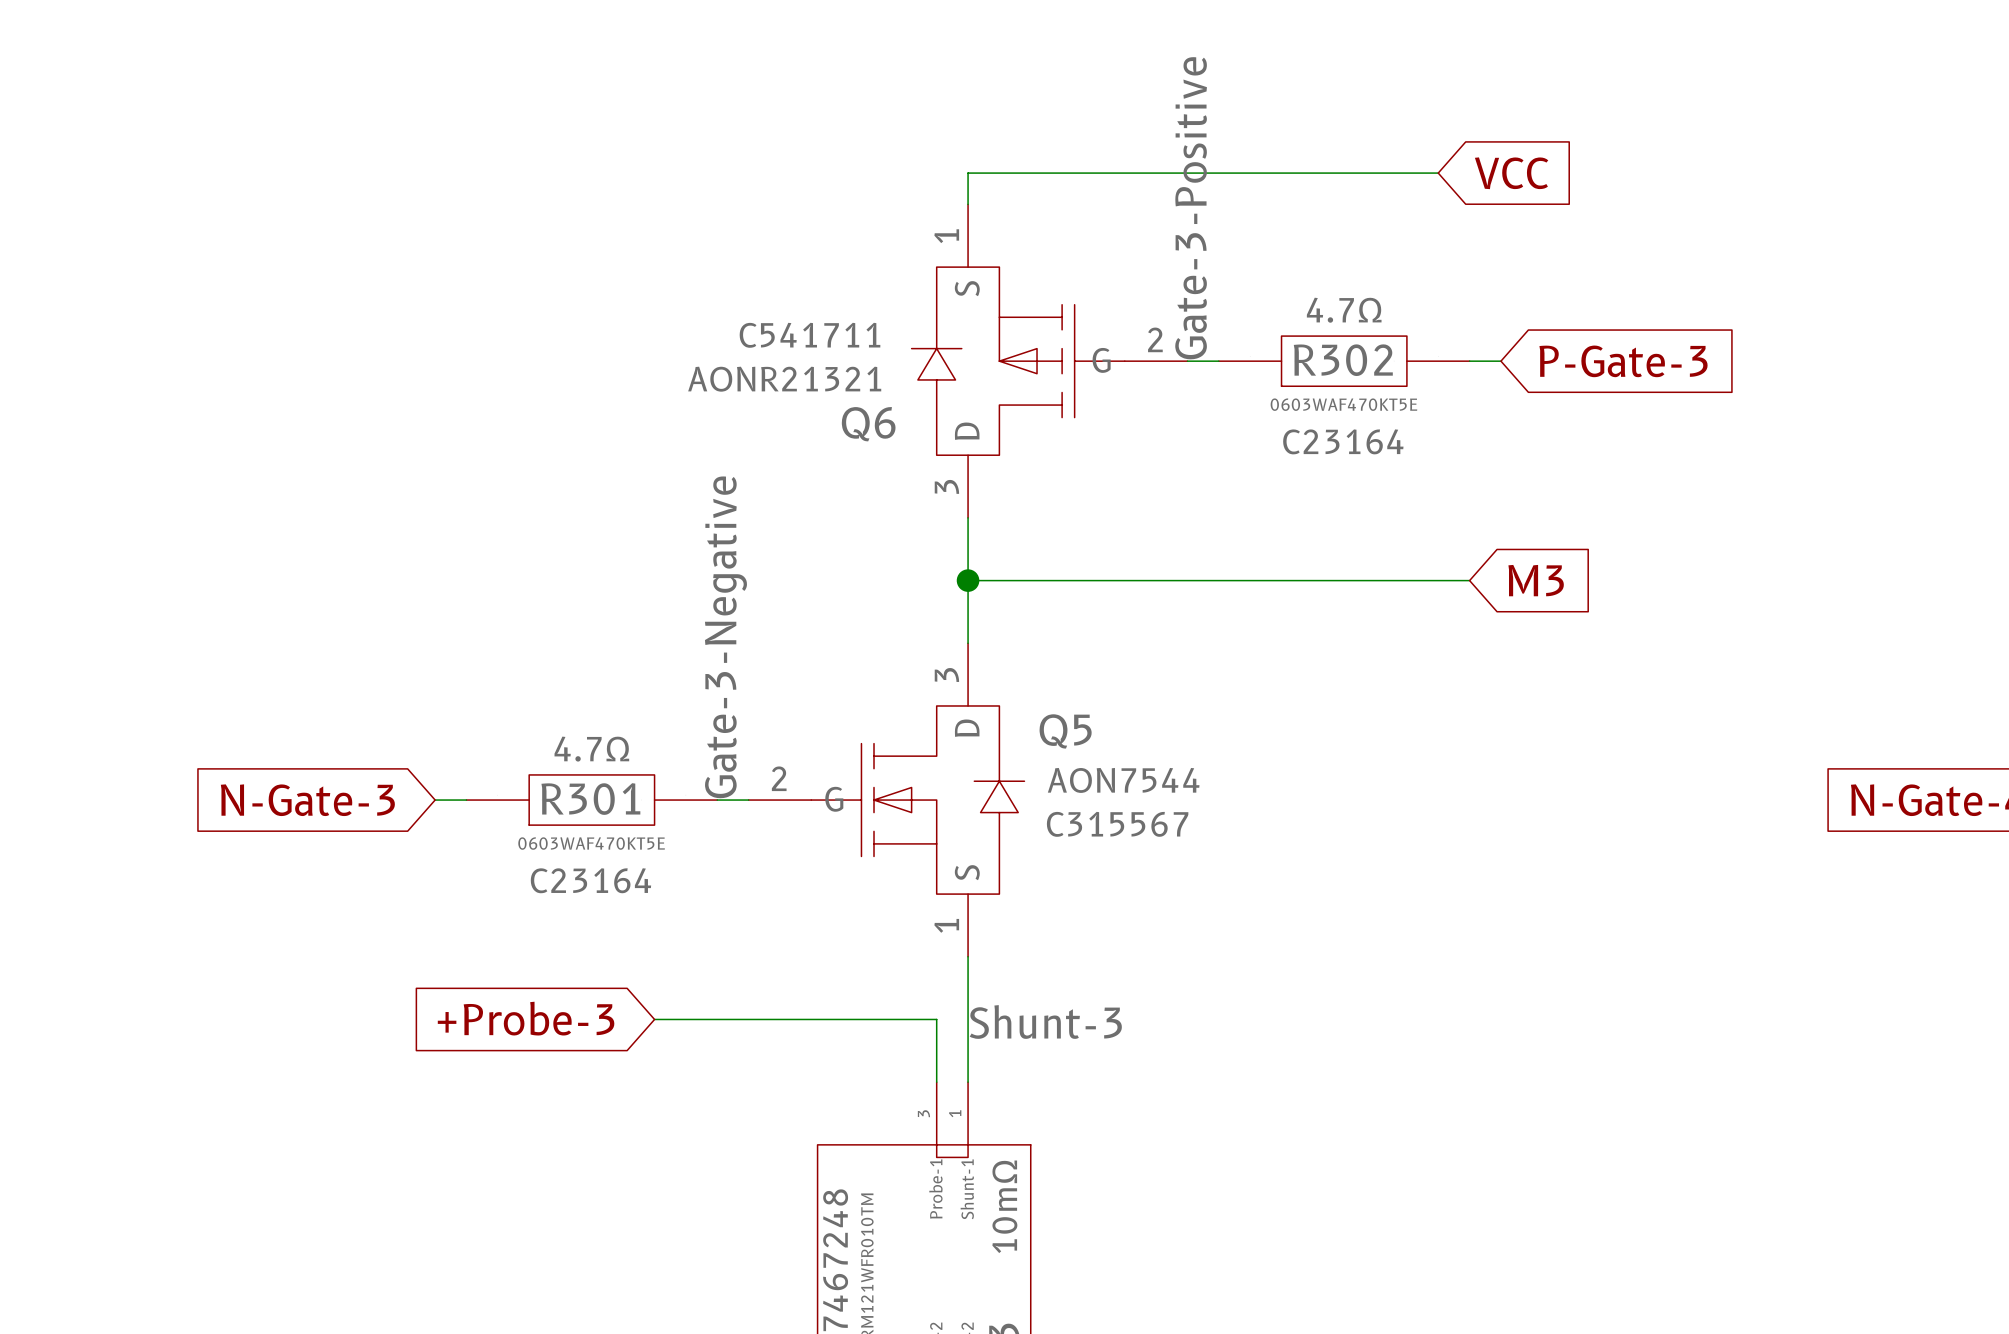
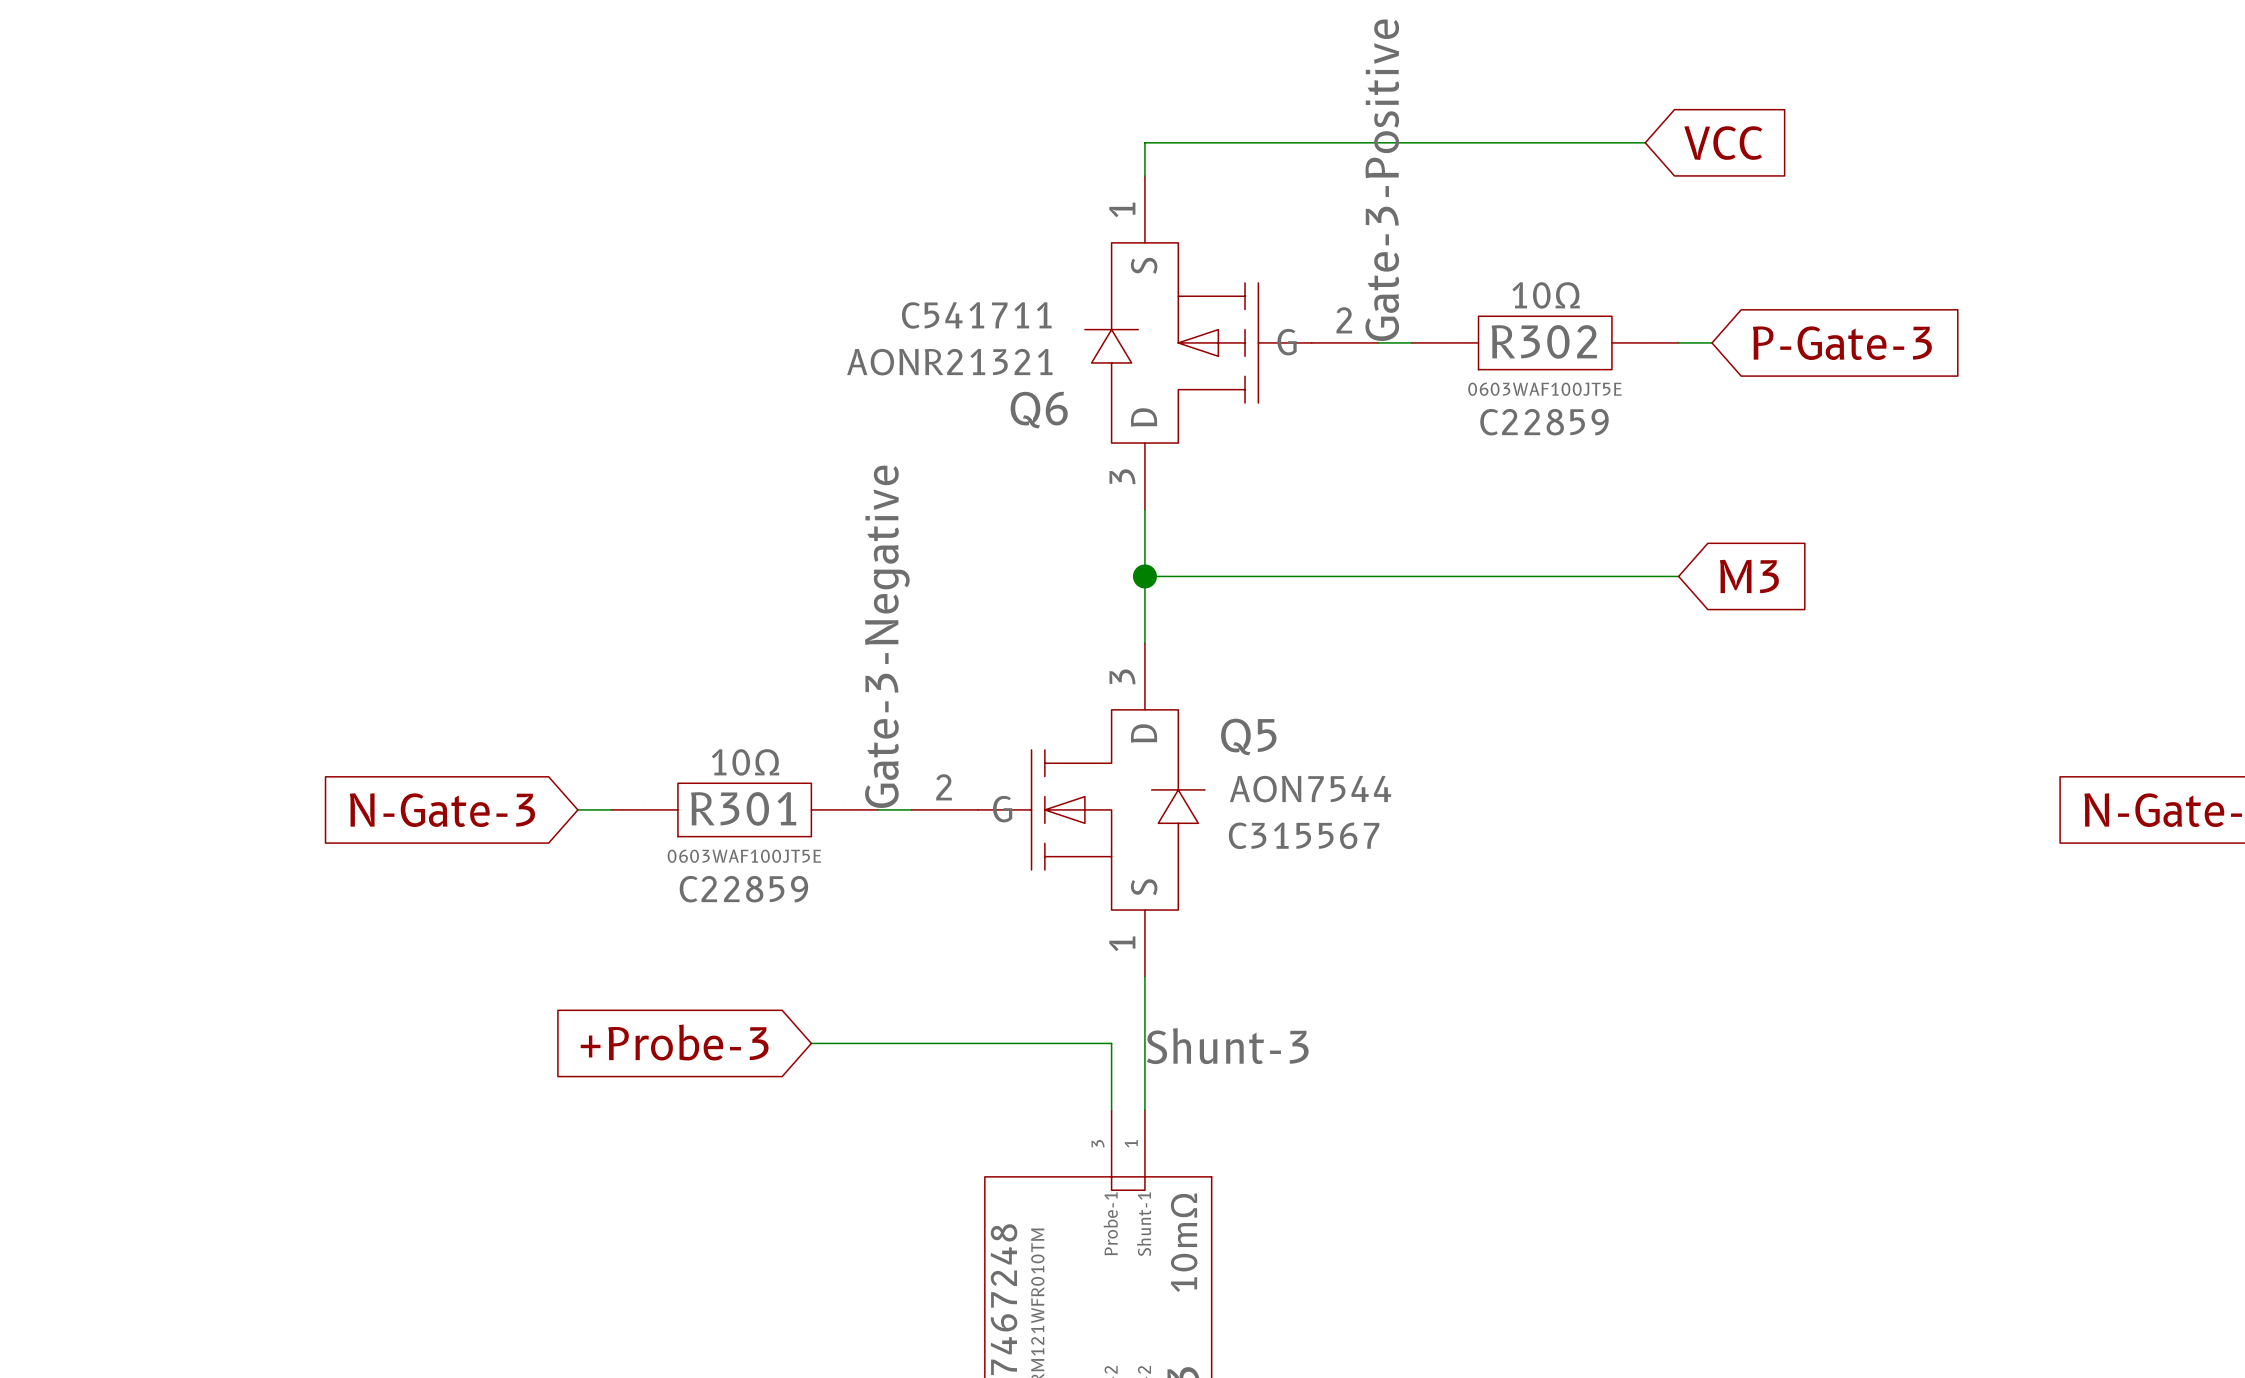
R302 value: 4.7Ω (1344, 310) -> 10Ω (1546, 295)
R302 text: 0603WAF470KT5E (1343, 404) -> 0603WAF100JT5E (1544, 389)
R302 text: C23164 (1343, 441) -> C22859 (1544, 422)
R301 value: 4.7Ω (591, 749) -> 10Ω (745, 762)
R301 text: 0603WAF470KT5E (591, 843) -> 0603WAF100JT5E (744, 856)
R301 text: C23164 (590, 880) -> C22859 (743, 889)

